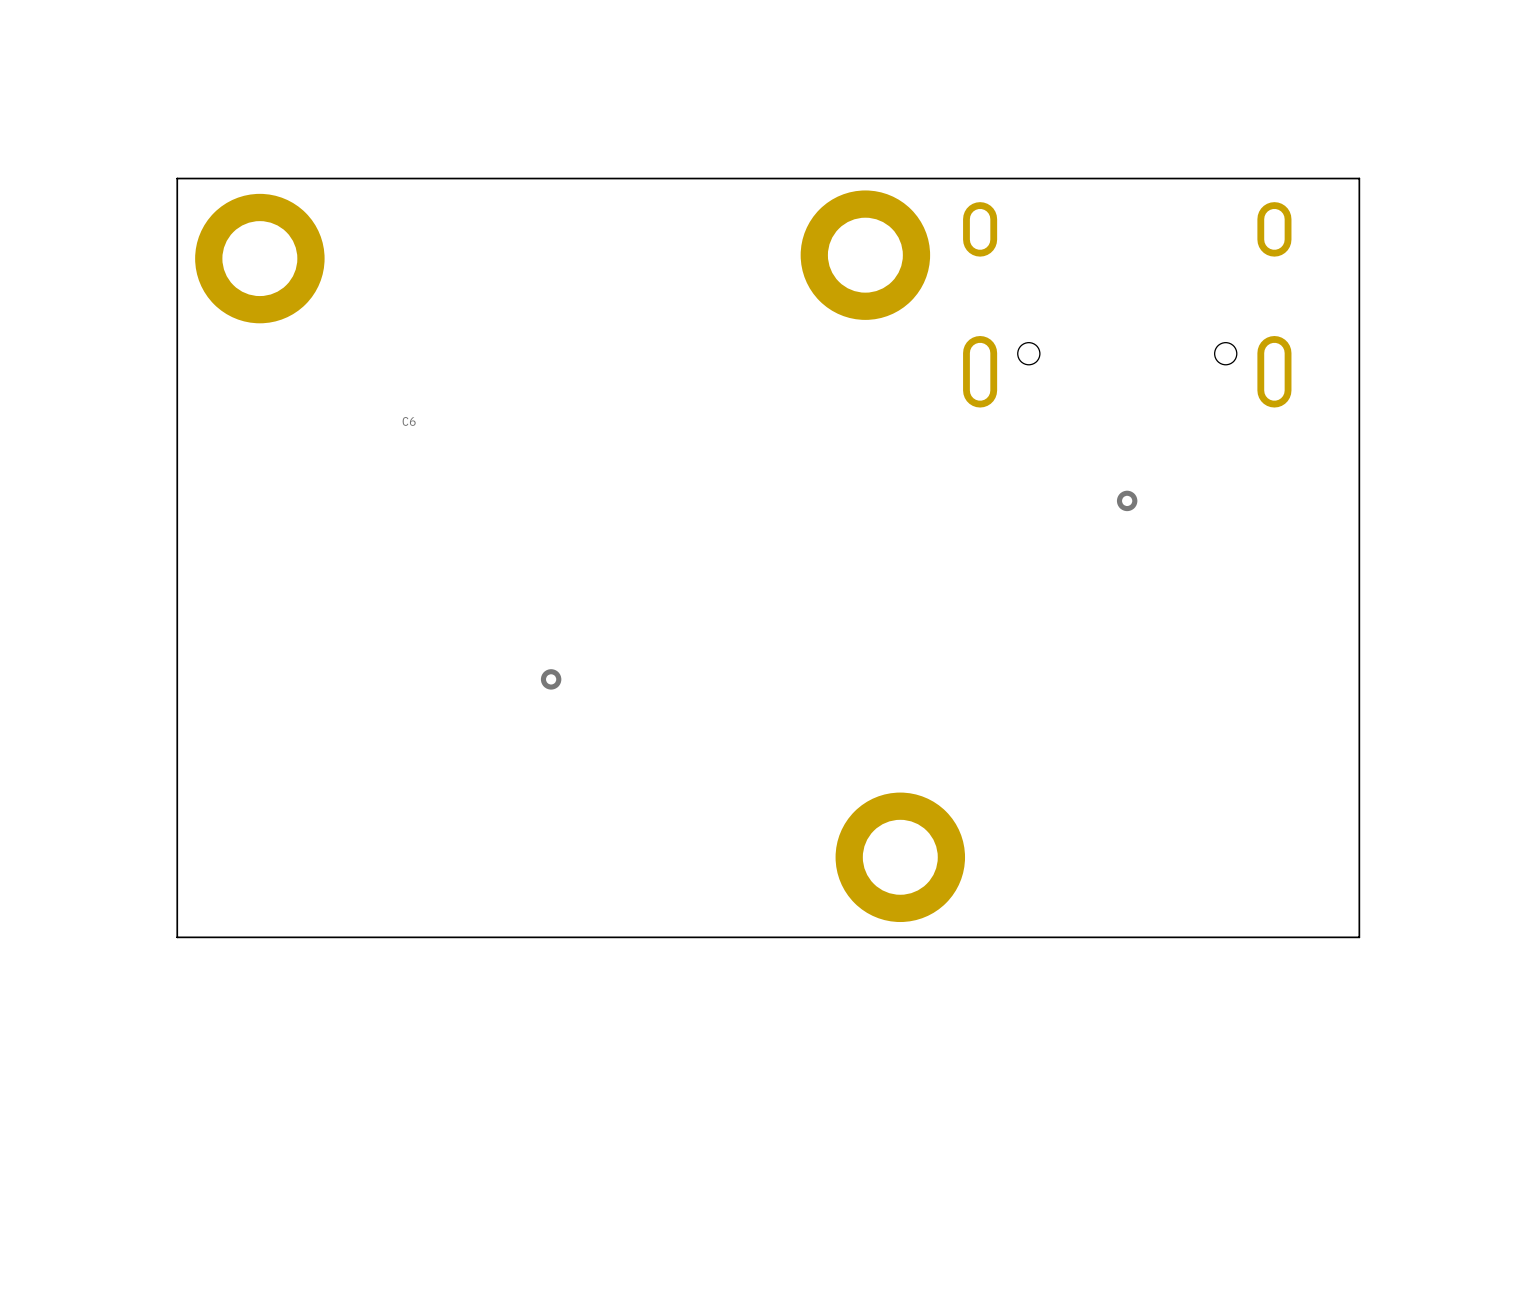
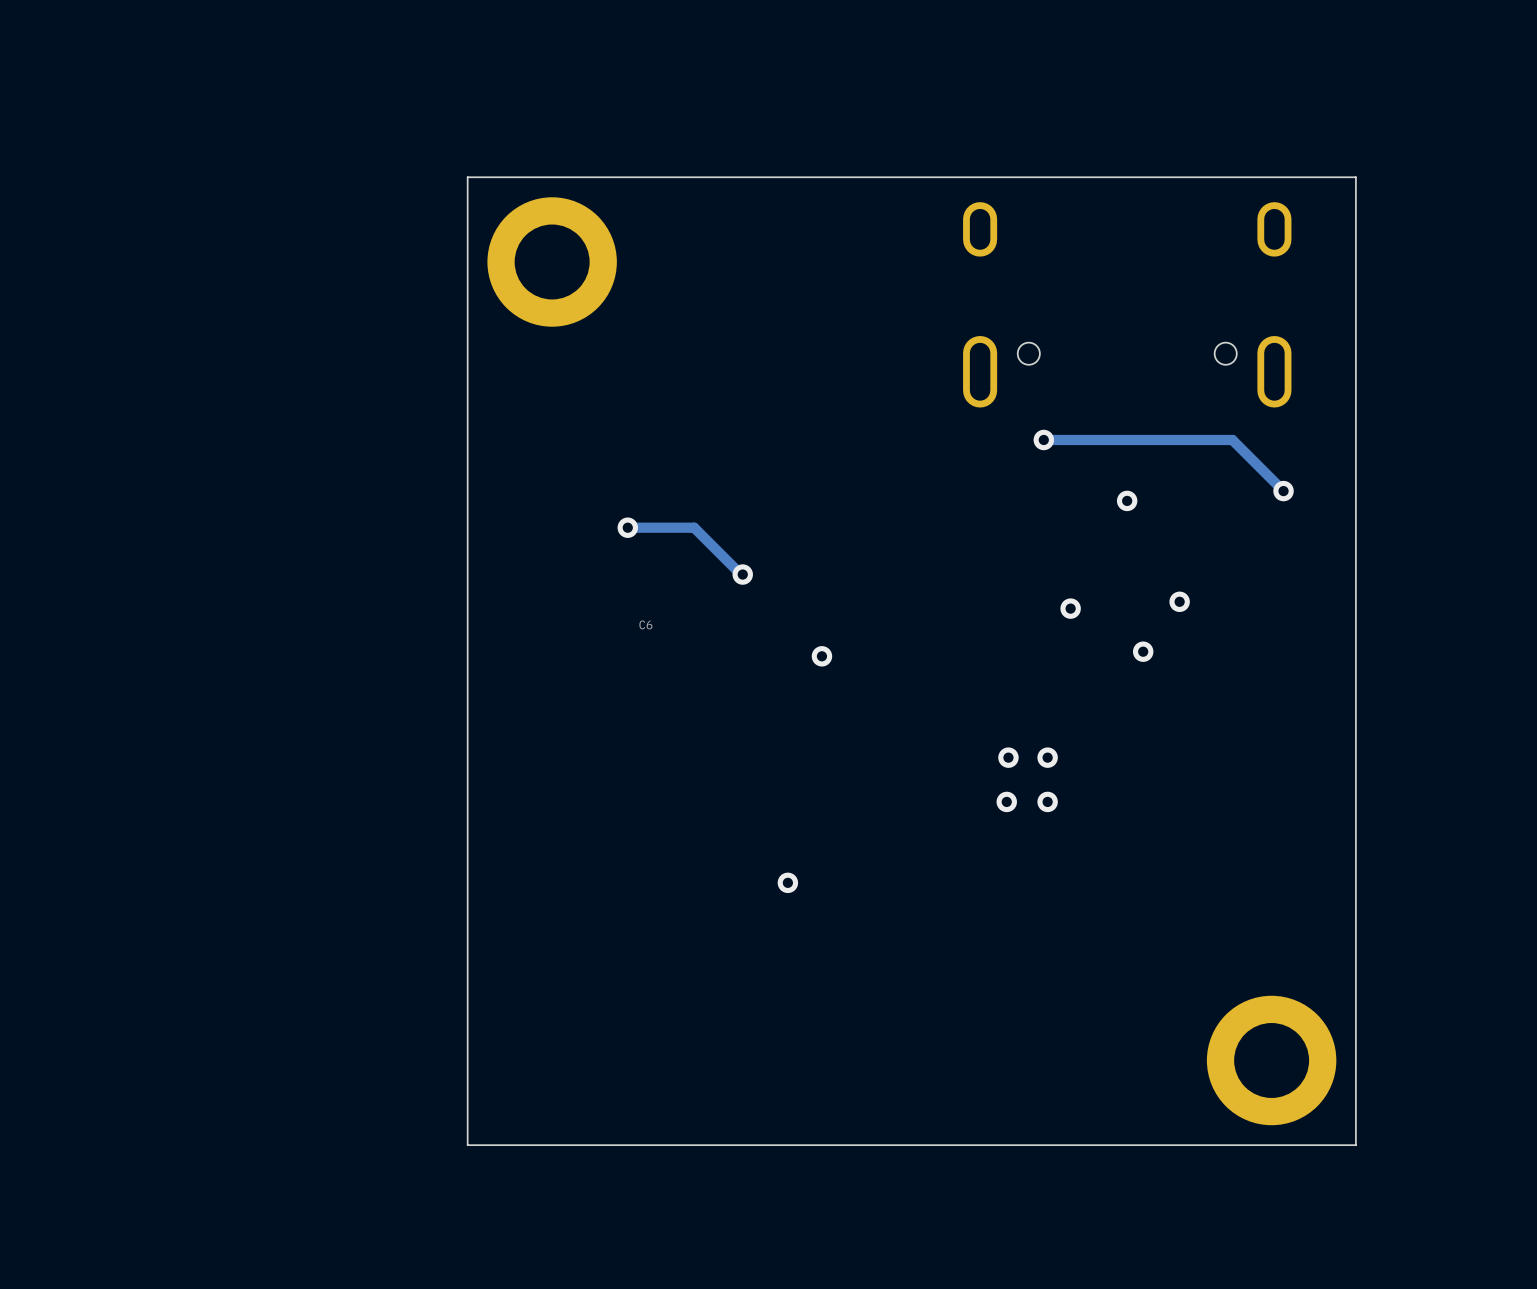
board edge: (1359, 178) (177, 178) (177, 937) (1359, 937) (1359, 178) -> (1355, 177) (1355, 1145) (467, 1145) (467, 177) (1355, 177)
part: (865, 255) -> none
part: (259, 258) -> none
part: none -> (552, 261)
C6 position: (409, 421) -> (645, 624)
track: none -> (1043, 439) (1232, 439) (1283, 491)
via: none -> (1043, 439)
via: none -> (1283, 491)
track: none -> (627, 527) (694, 527) (742, 574)
via: none -> (627, 527)
via: none -> (742, 574)
via: none -> (1179, 601)
via: none -> (1070, 608)
via: none -> (1143, 651)
via: none -> (821, 656)
via: (551, 679) -> none
via: none -> (1008, 757)
via: none -> (1047, 757)
via: none -> (1006, 801)
via: none -> (1047, 801)
part: (900, 857) -> none
via: none -> (787, 882)
part: none -> (1271, 1060)

